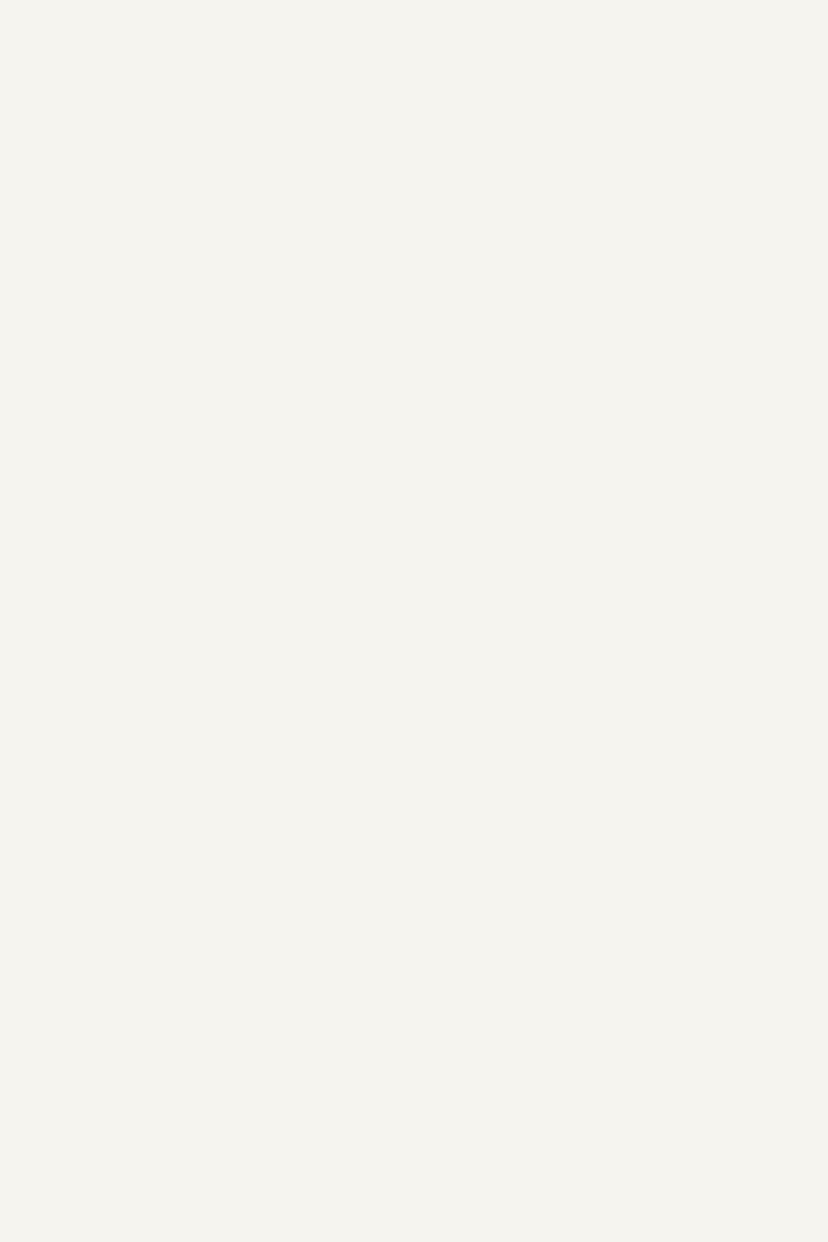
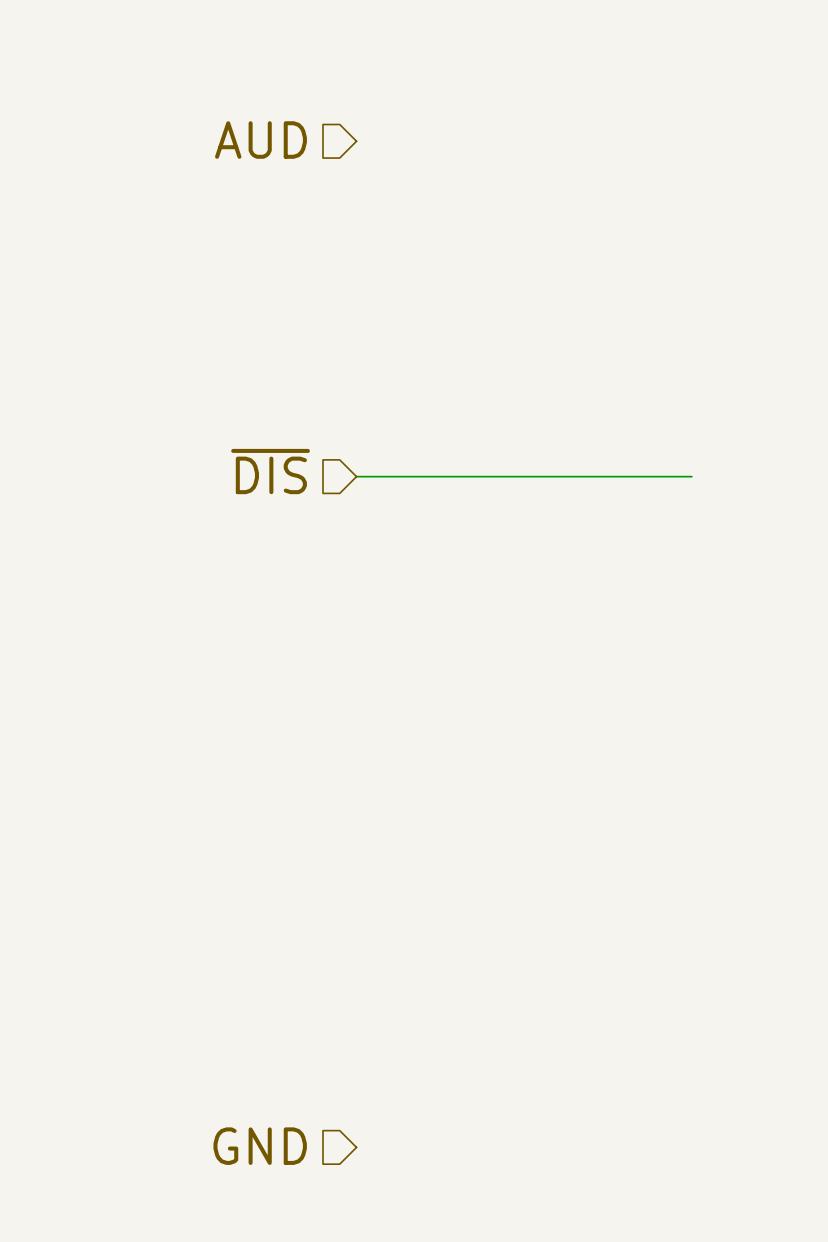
hierarchical label: none -> AUD (260, 140)
hierarchical label: none -> ~{DIS} (270, 471)
wire: none -> (356, 476) (691, 476)
hierarchical label: none -> GND (260, 1146)

